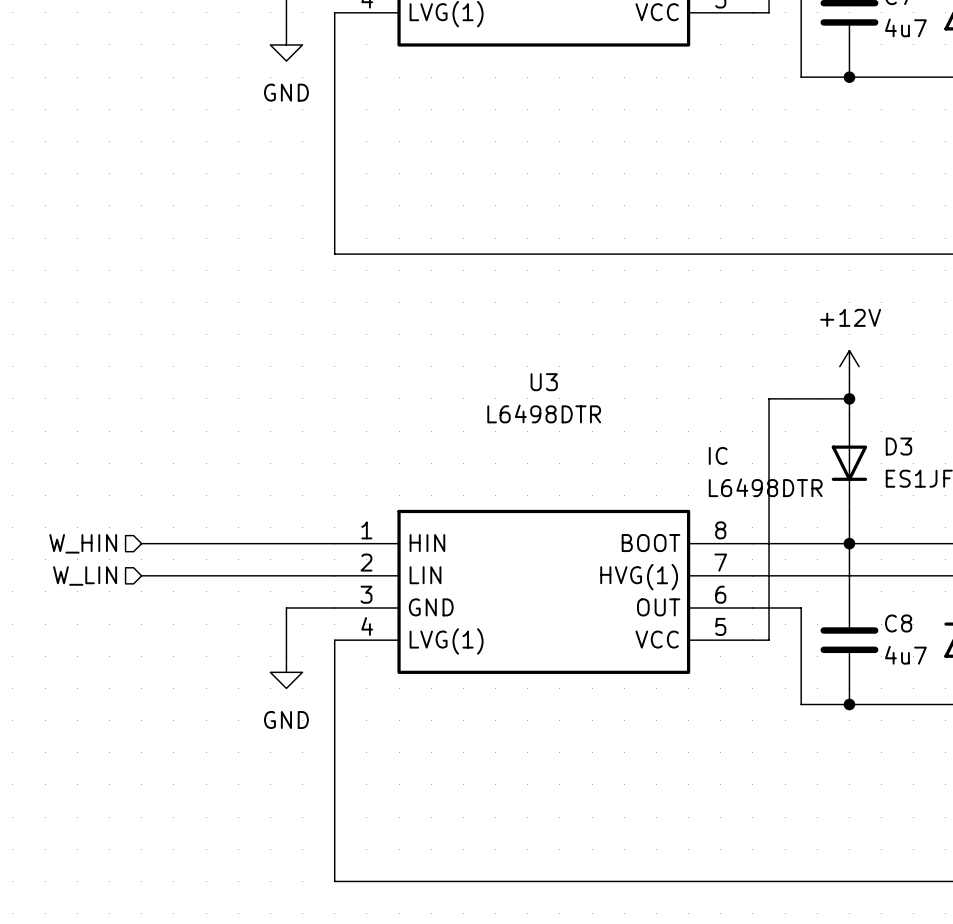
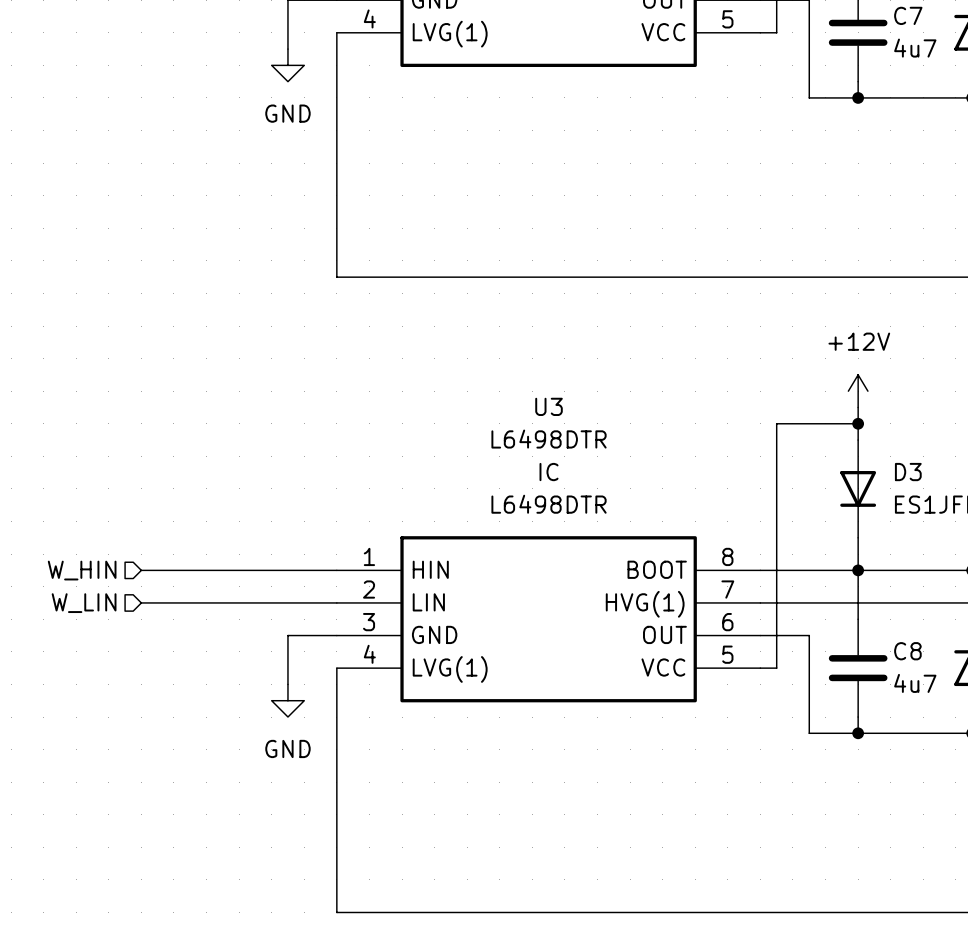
U3 text position: IC (718, 455) -> IC (549, 472)
U3 text position: L6498DTR (765, 487) -> L6498DTR (549, 504)

